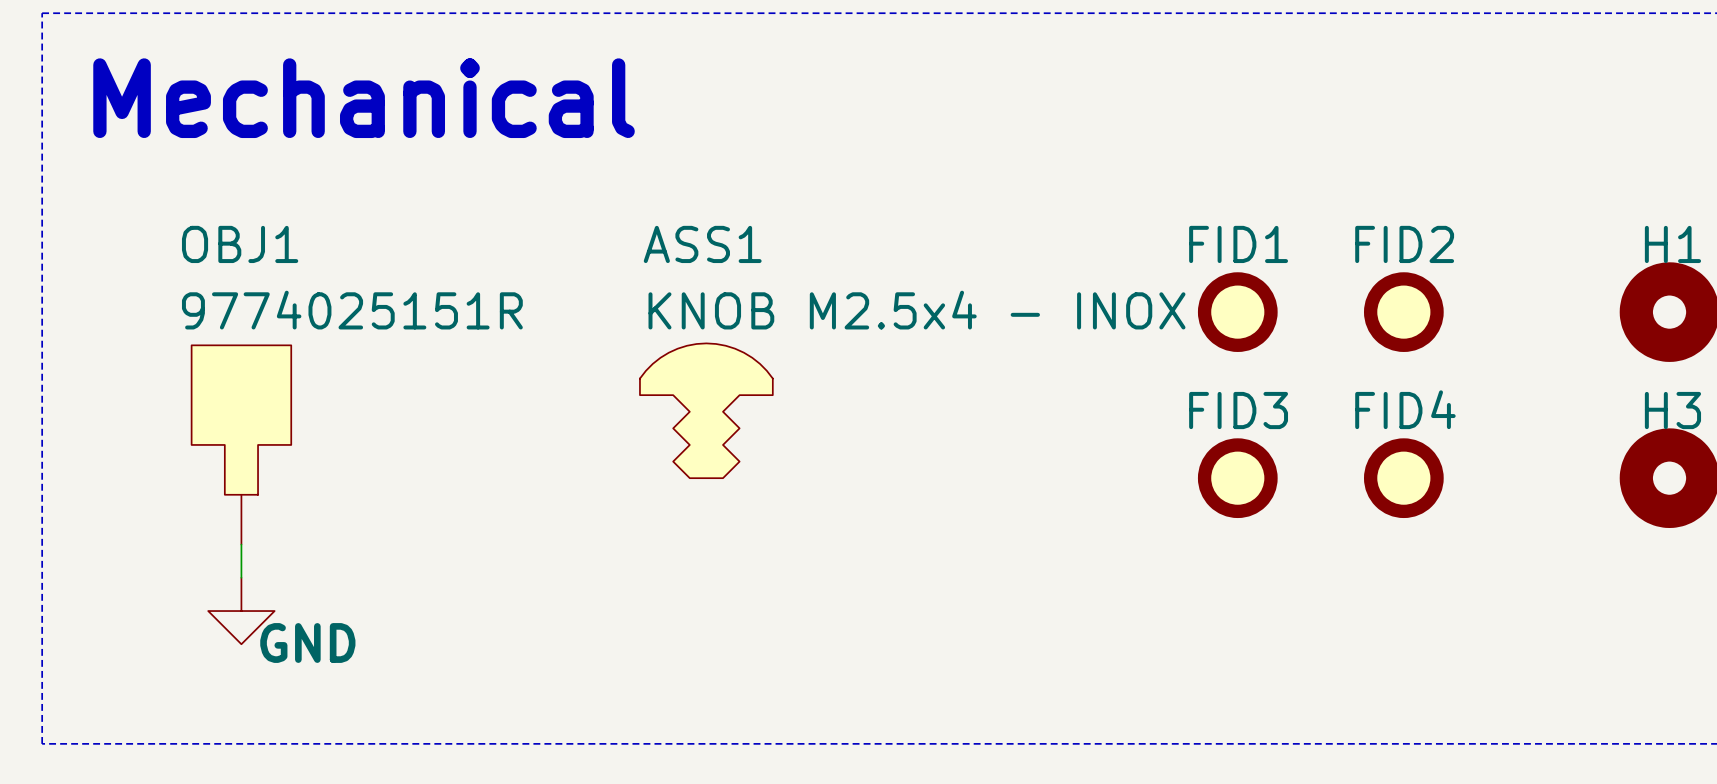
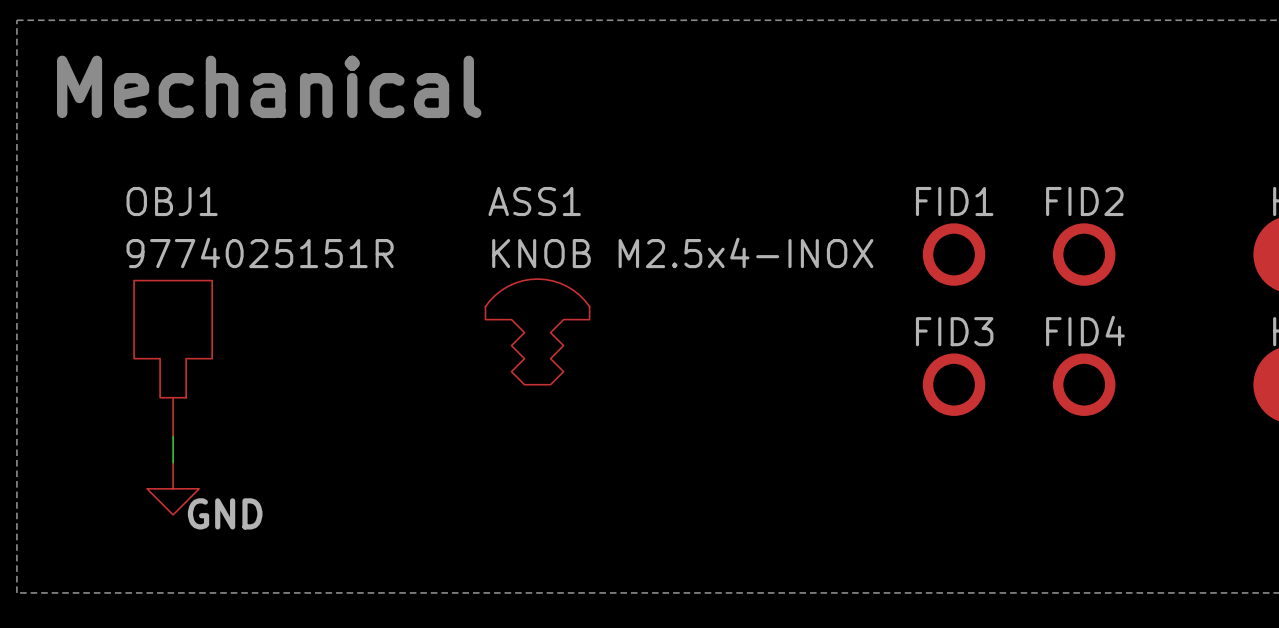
ASS1 value: KNOB M2.5x4 - INOX (916, 310) -> KNOB M2.5x4-INOX (682, 252)

